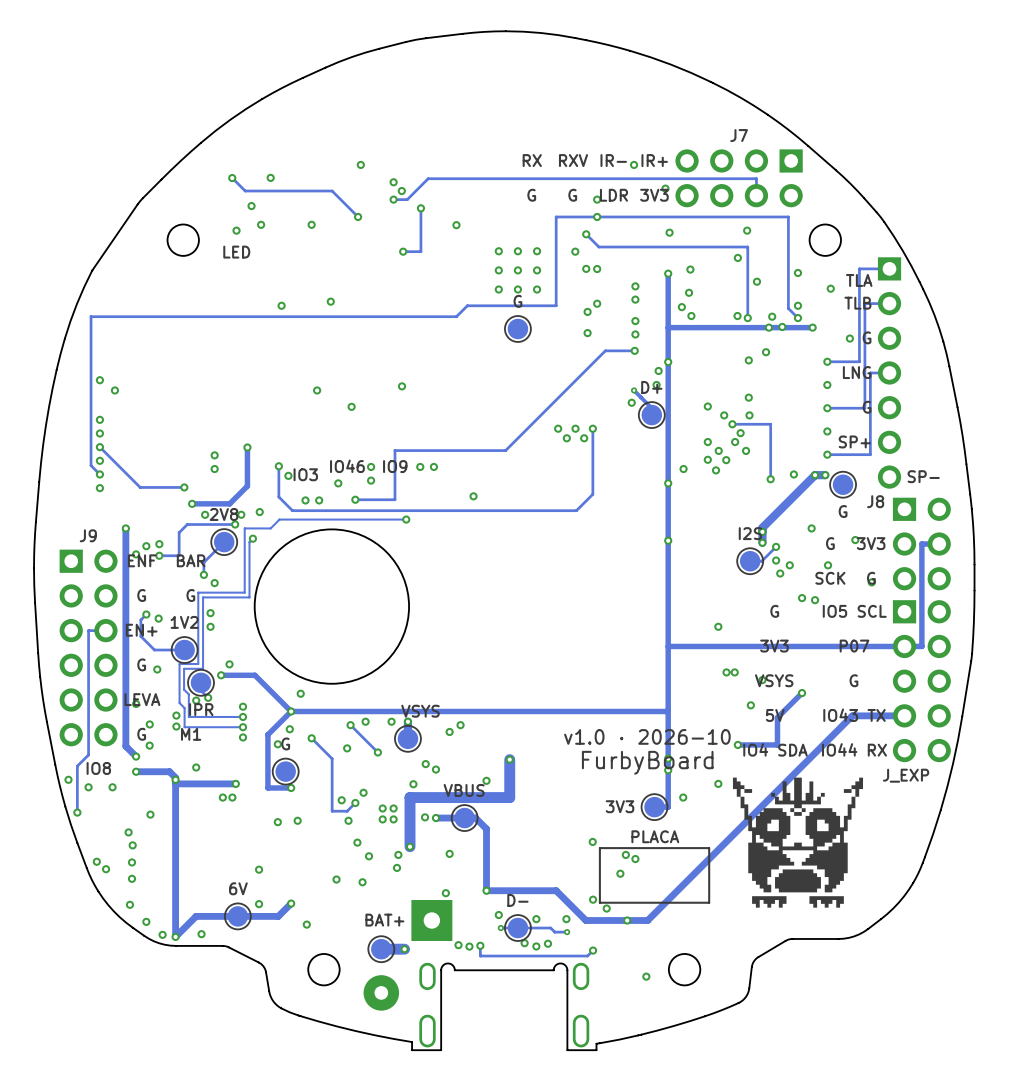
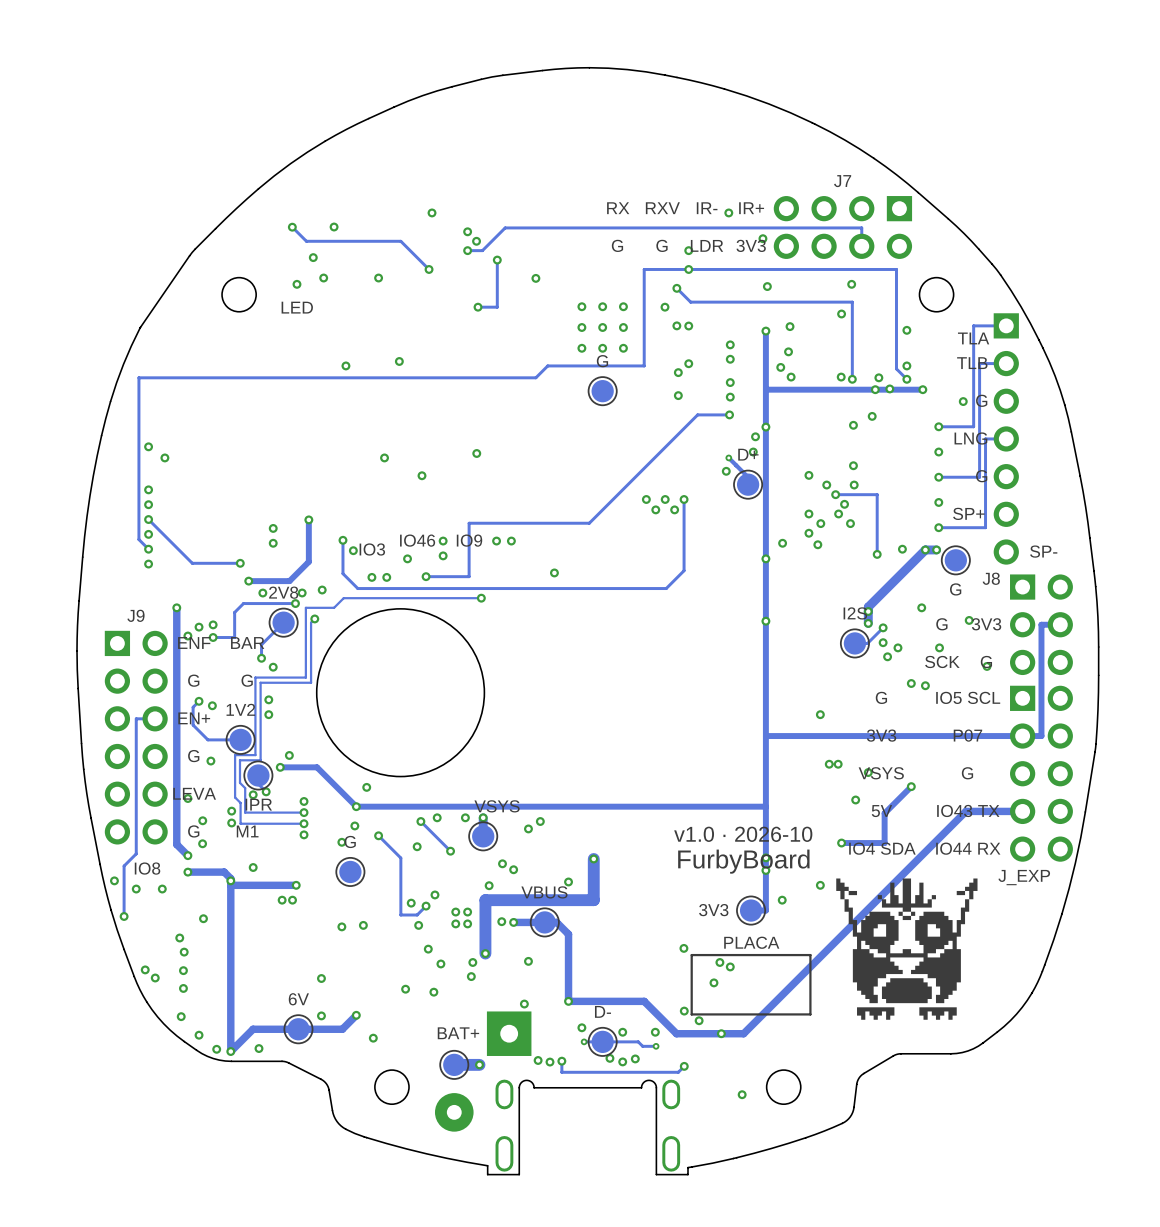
via: (756, 281) -> none
via: (830, 288) -> none
via: (726, 460) -> none
track: (291, 711) (267, 734) (267, 787) (291, 787) -> none
via: (291, 787) -> none

